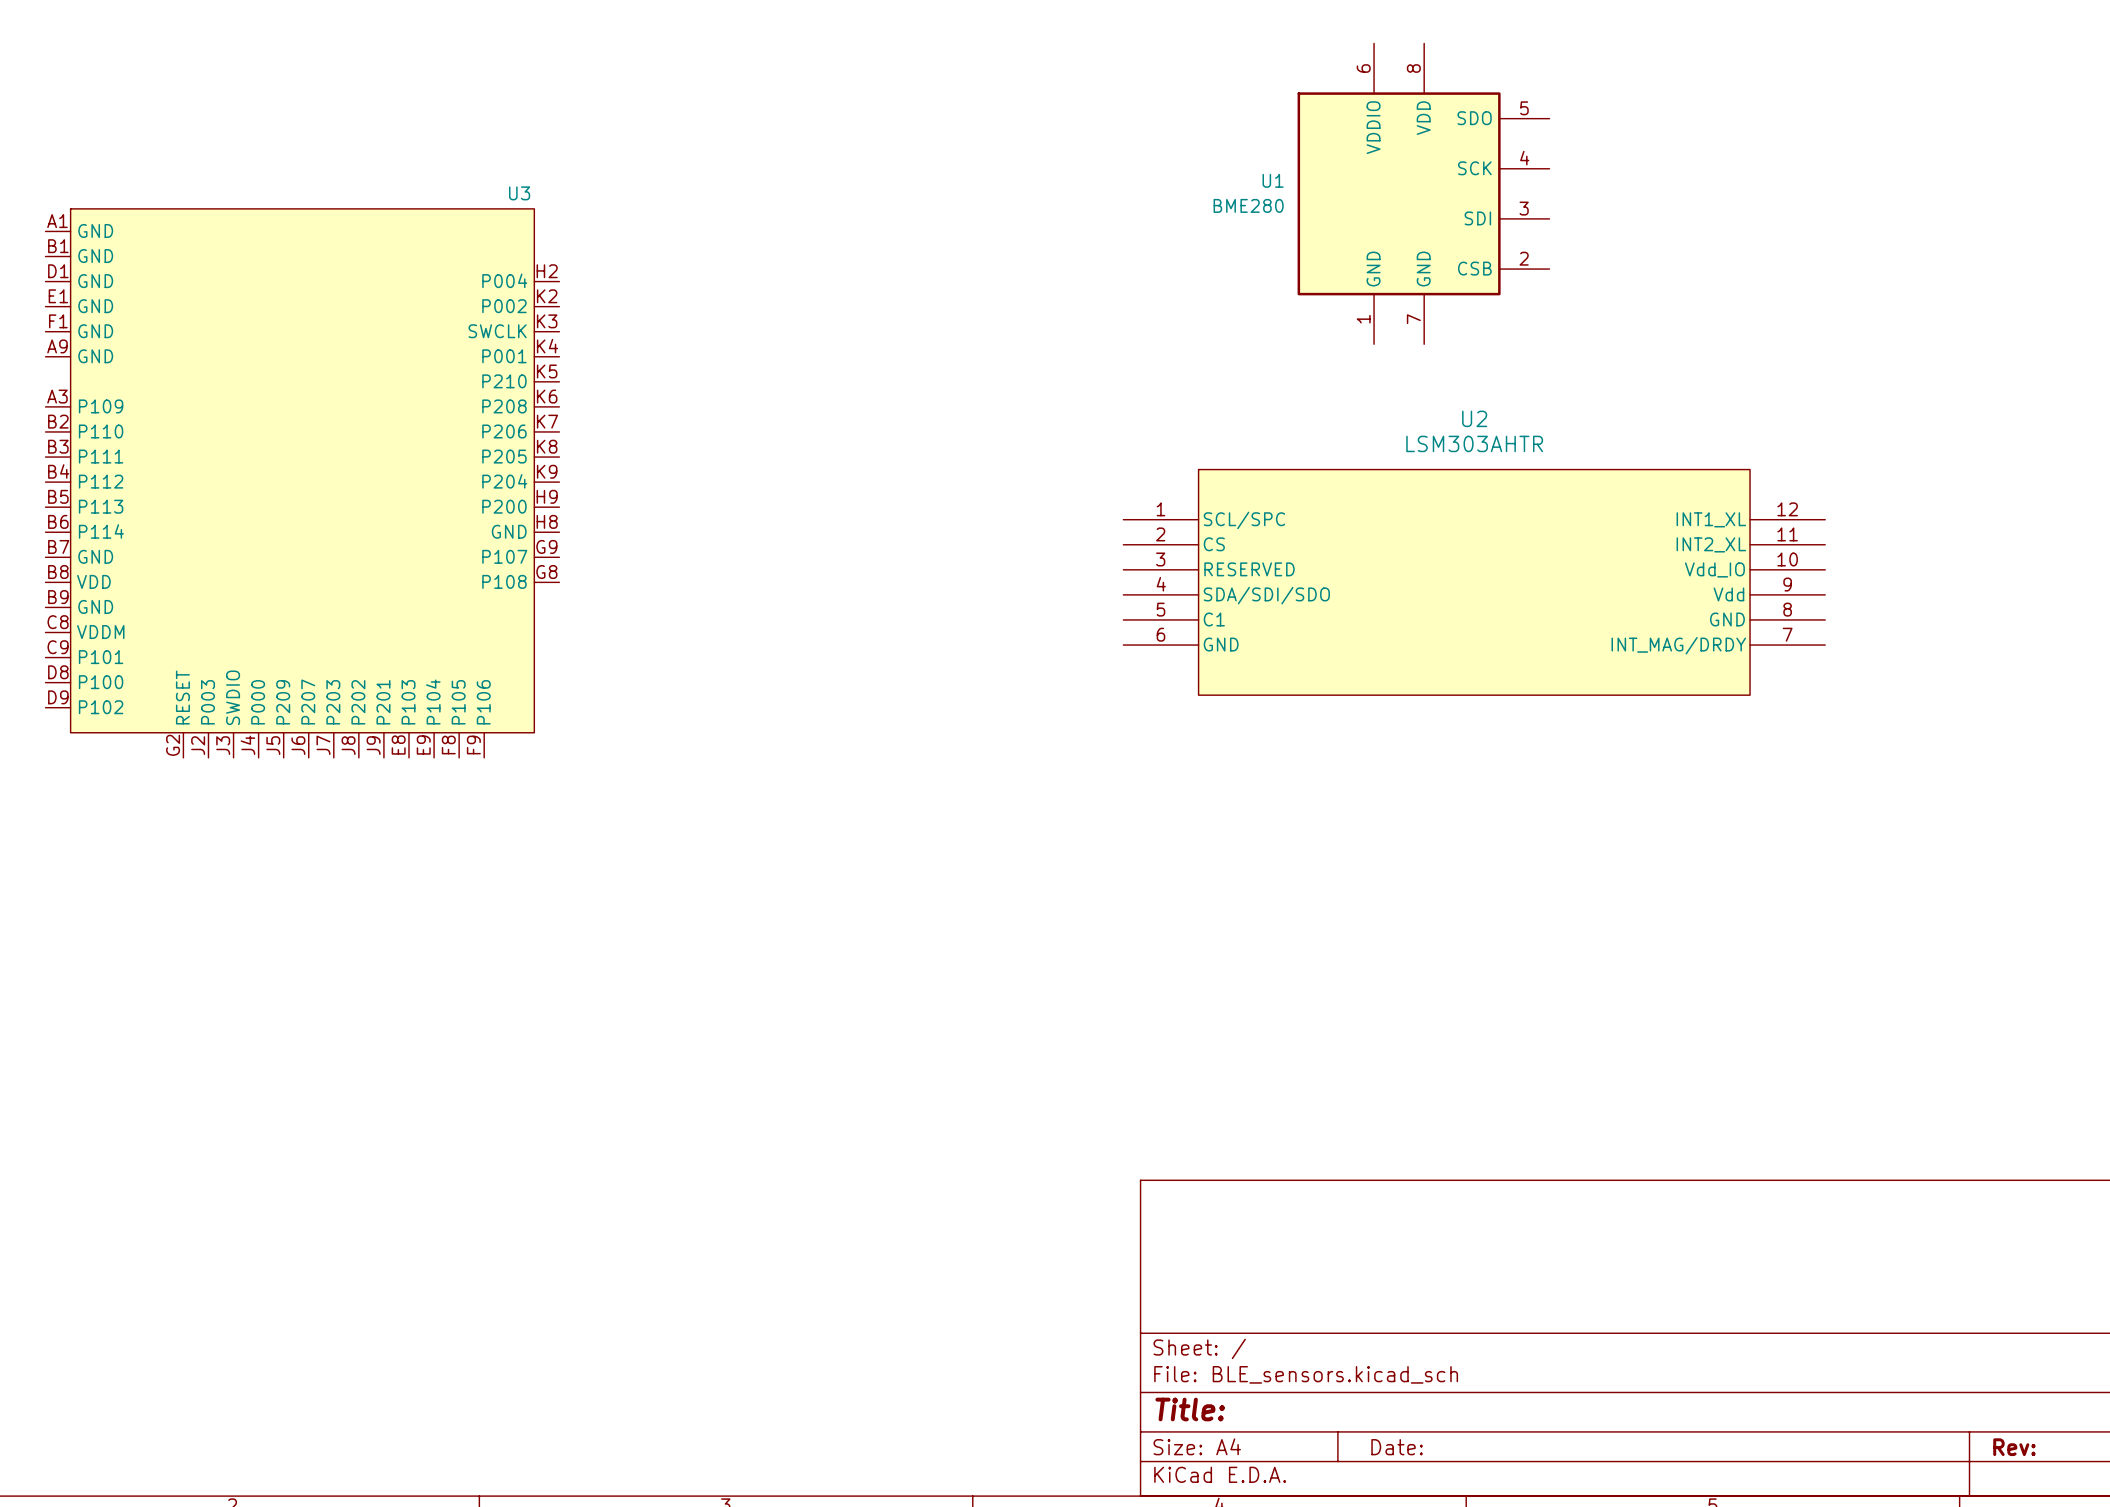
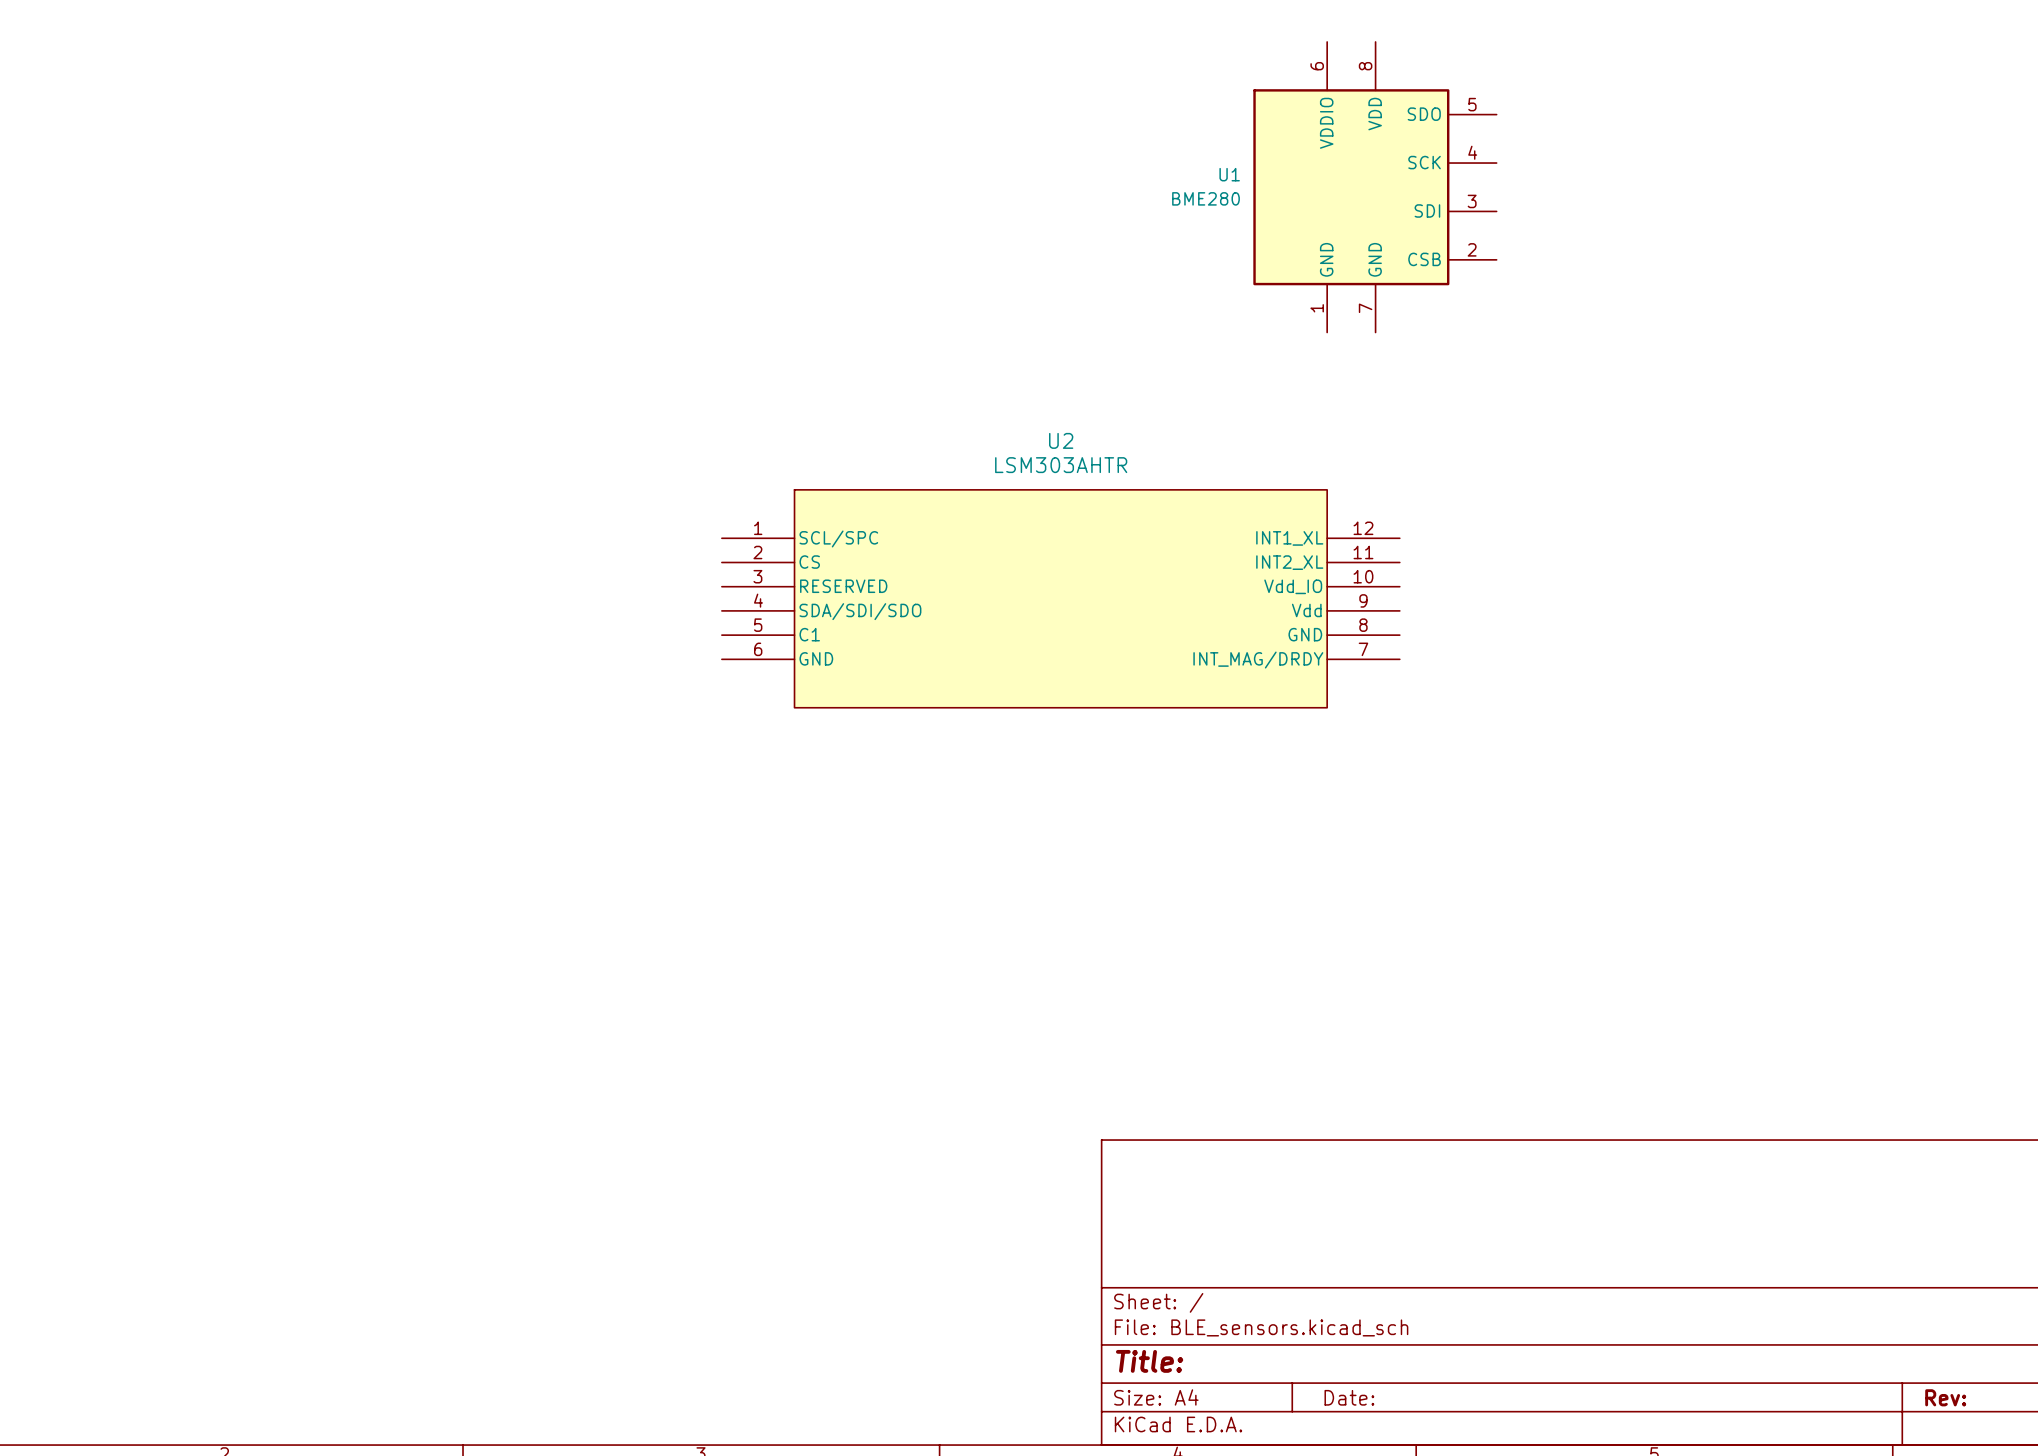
U3: (302, 483) -> none
U2 position: (1474, 582) -> (1060, 598)

